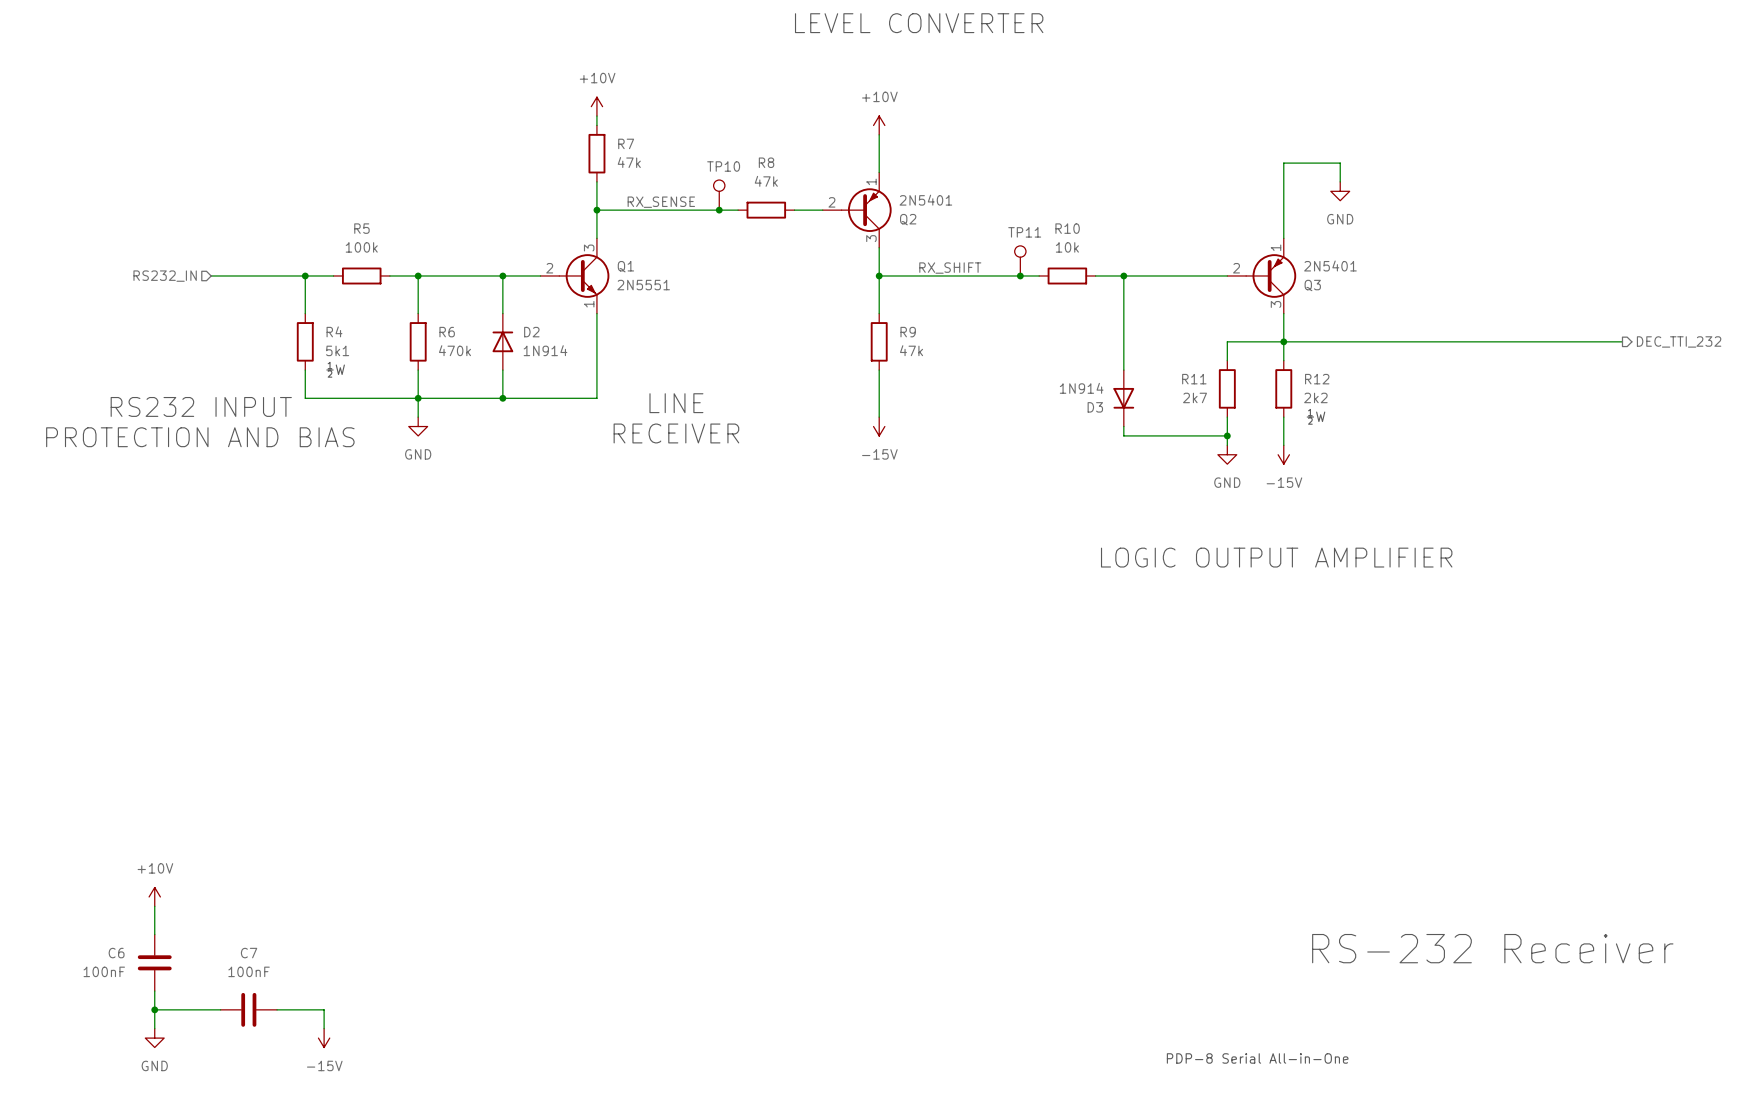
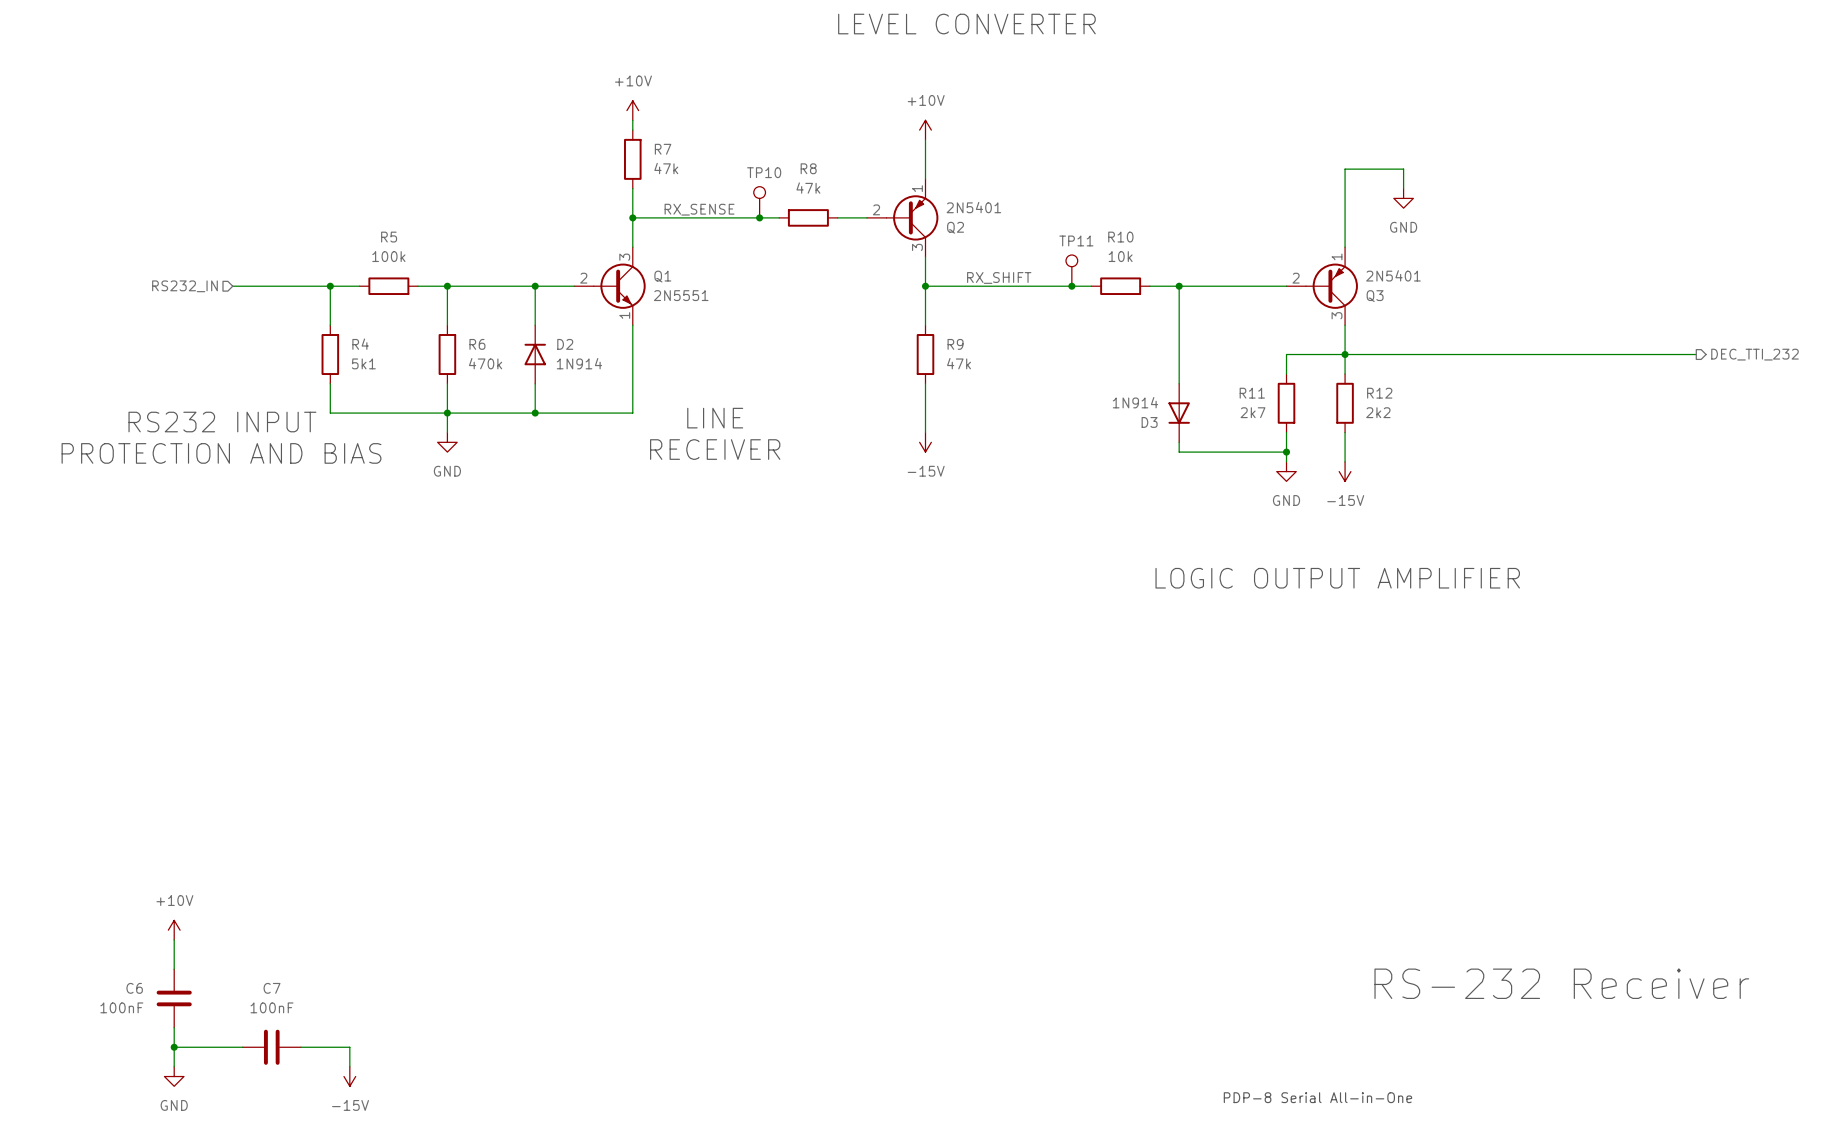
text: ½W (335, 369) -> none
text: ½W (1315, 416) -> none

